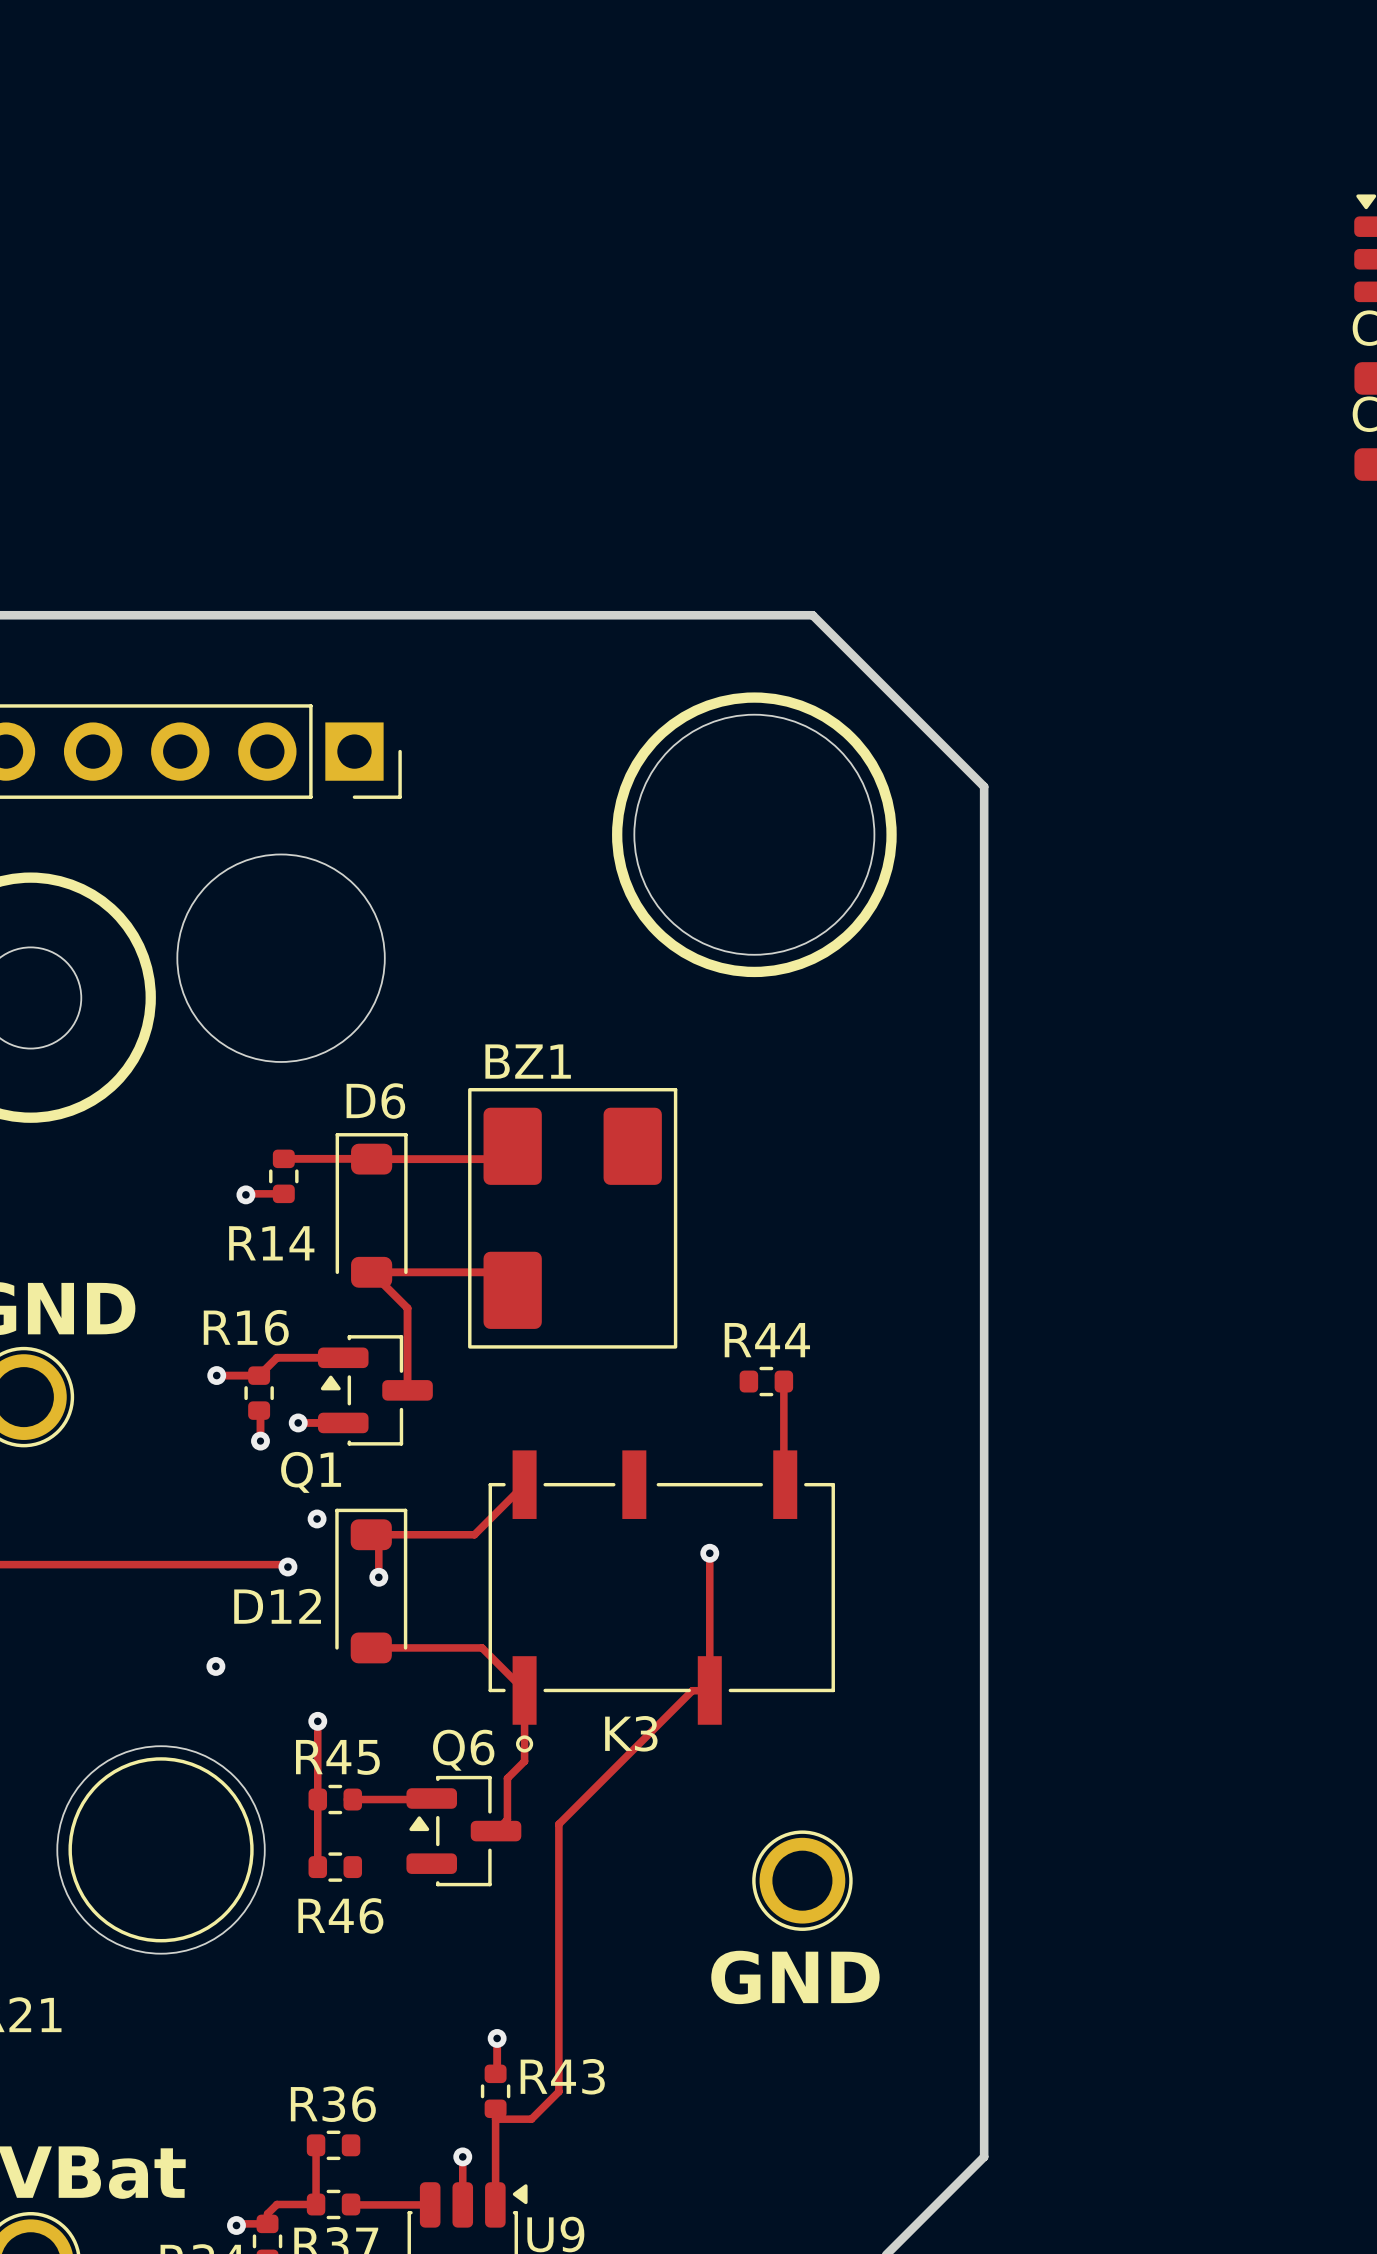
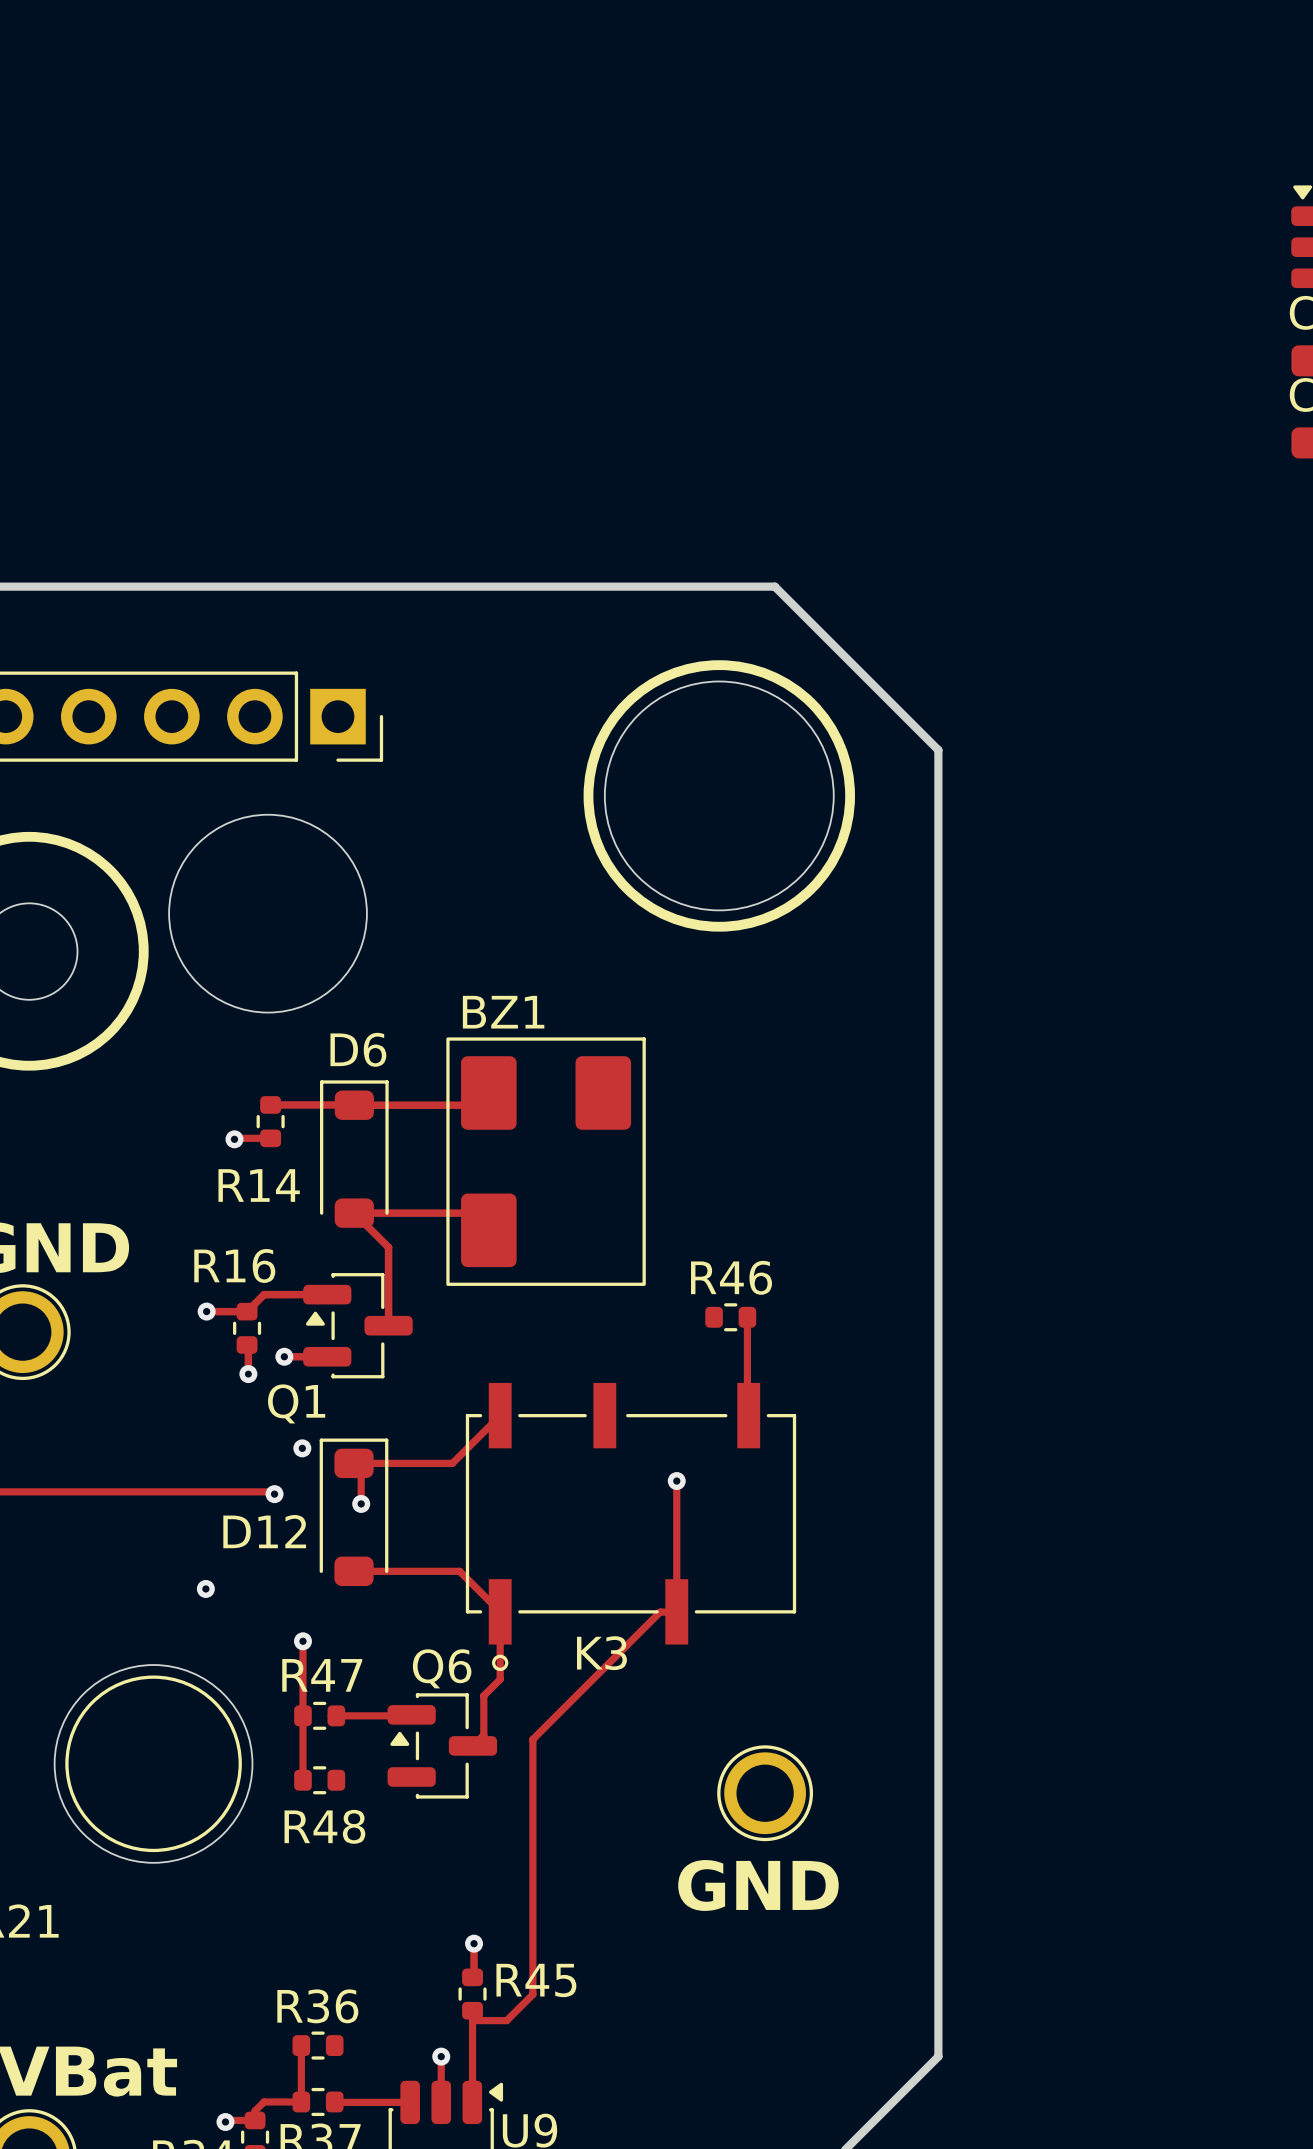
R44 name: R44 (767, 1340) -> R46 (731, 1277)
R45 name: R45 (337, 1757) -> R47 (322, 1675)
R46 name: R46 (340, 1915) -> R48 (324, 1826)
R43 name: R43 (562, 2076) -> R45 (536, 1980)

